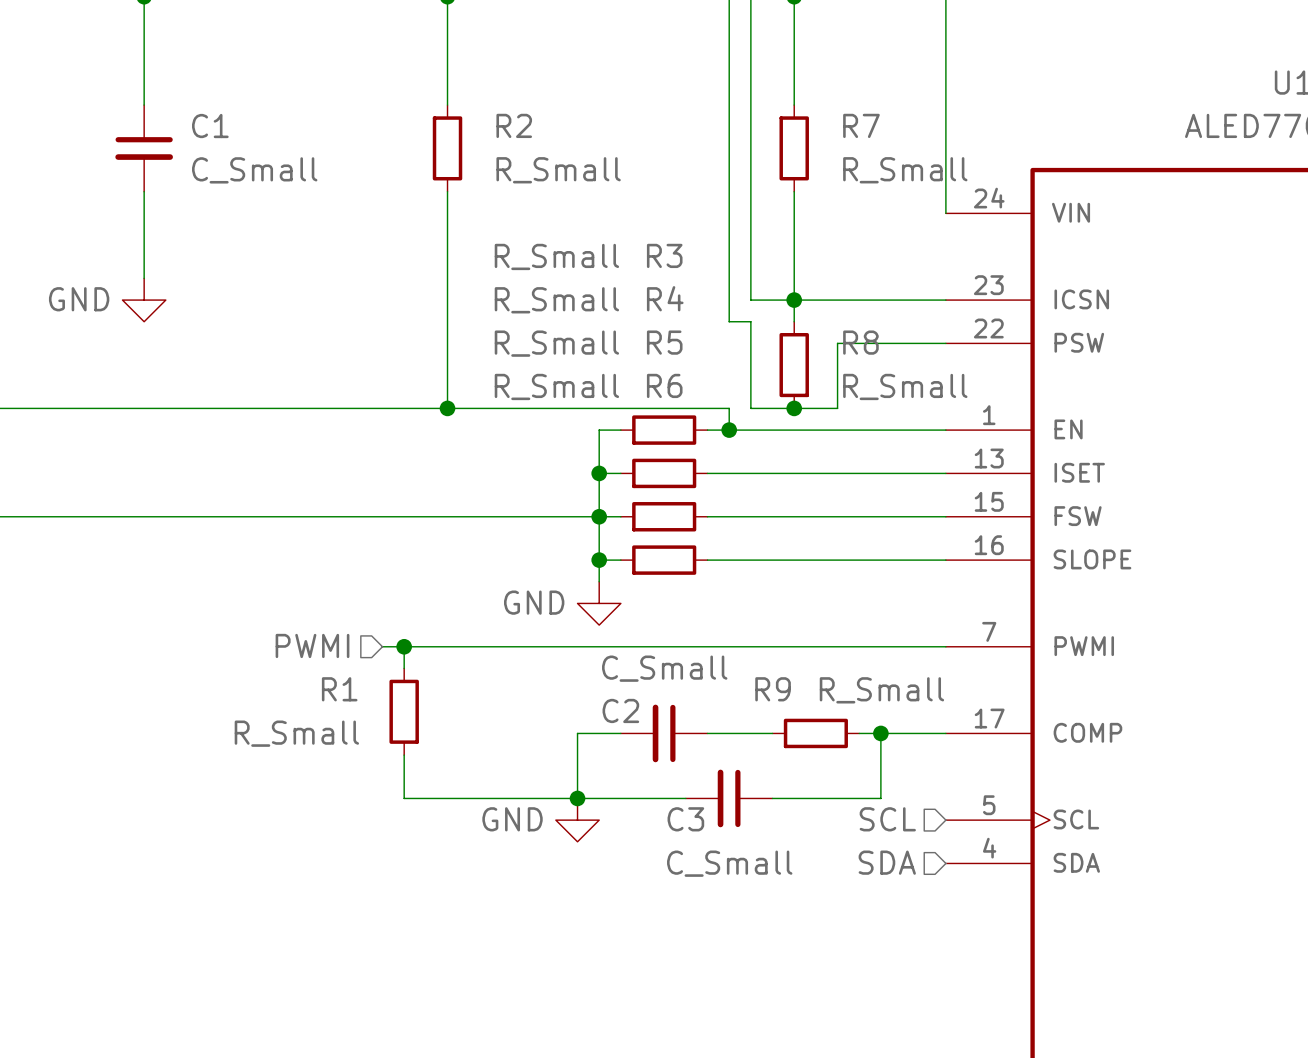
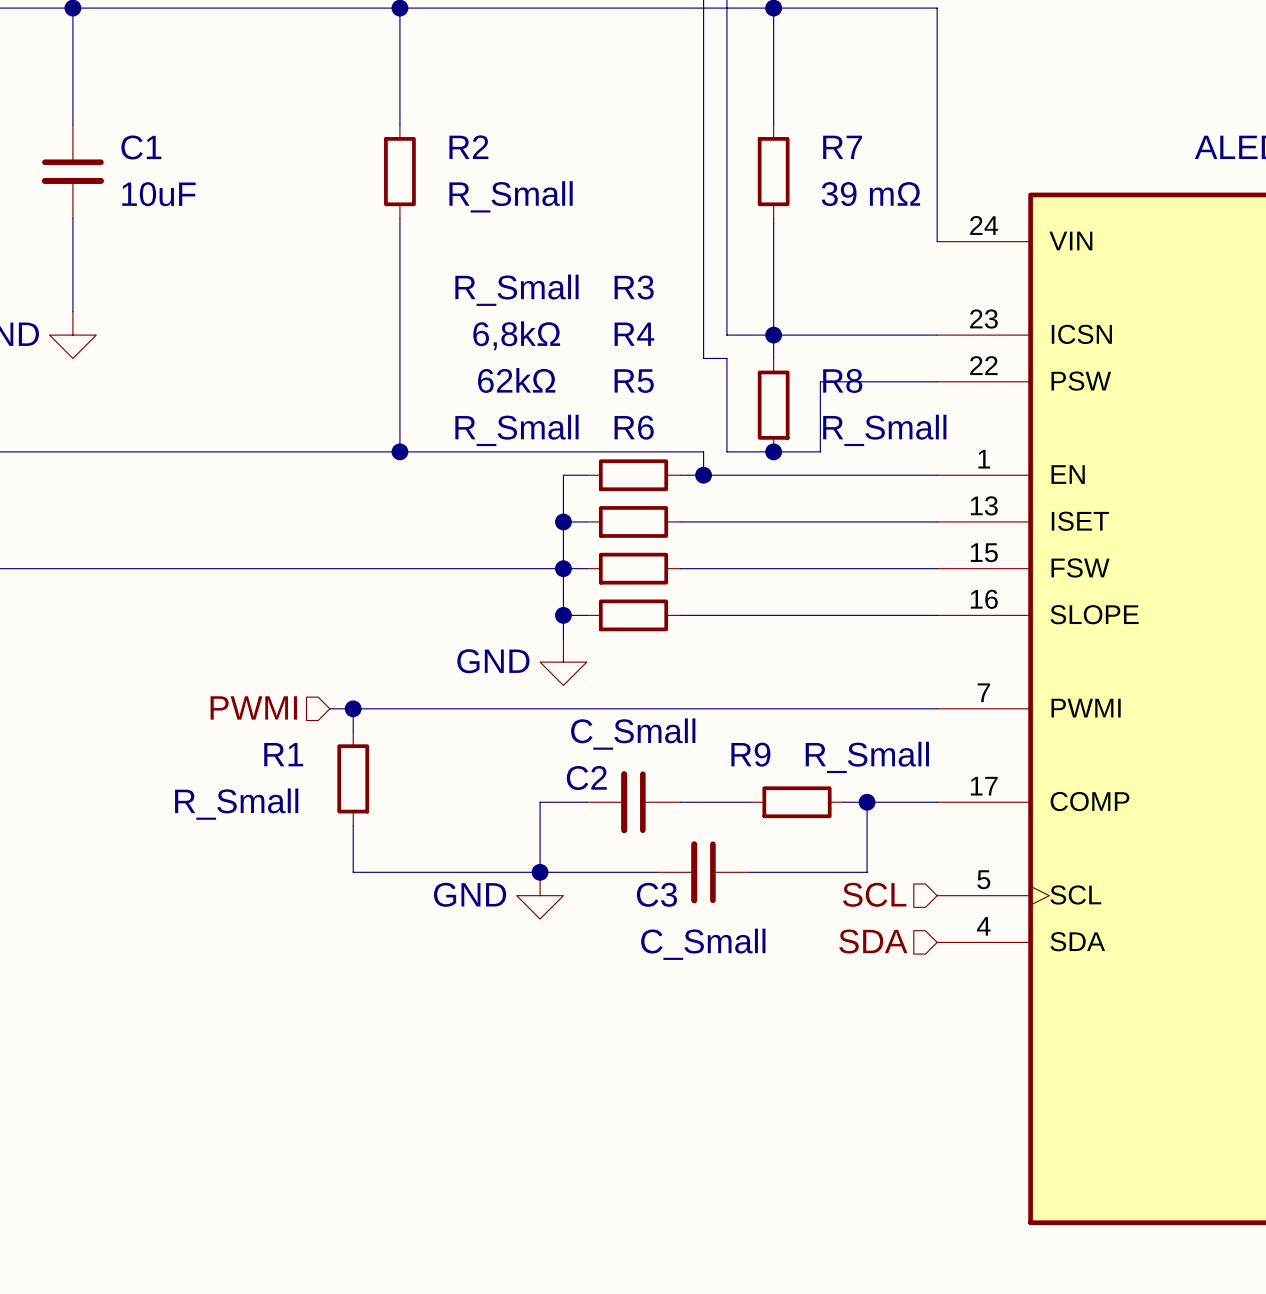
C1 value: C_Small (254, 170) -> 10uF (158, 194)
R7 value: R_Small (905, 170) -> 39 mΩ (870, 194)
R4 value: R_Small (556, 300) -> 6,8kΩ (516, 335)
R5 value: R_Small (556, 343) -> 62kΩ (516, 380)

